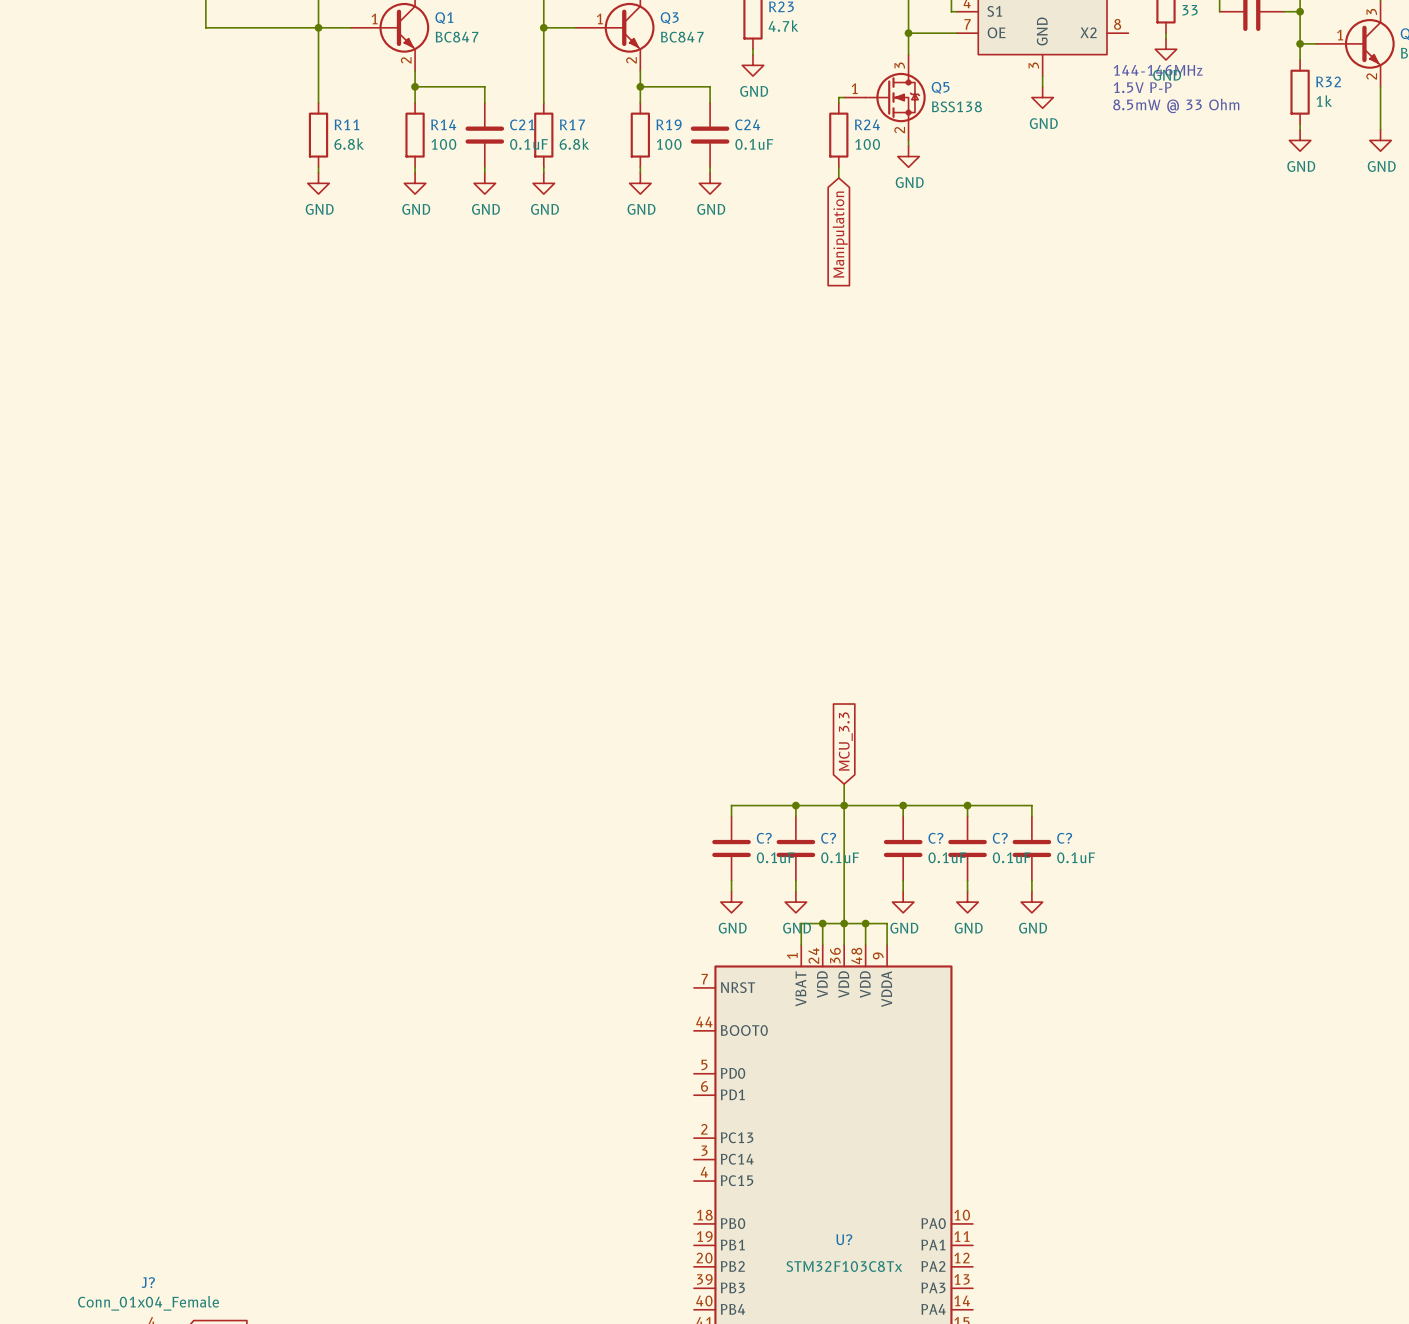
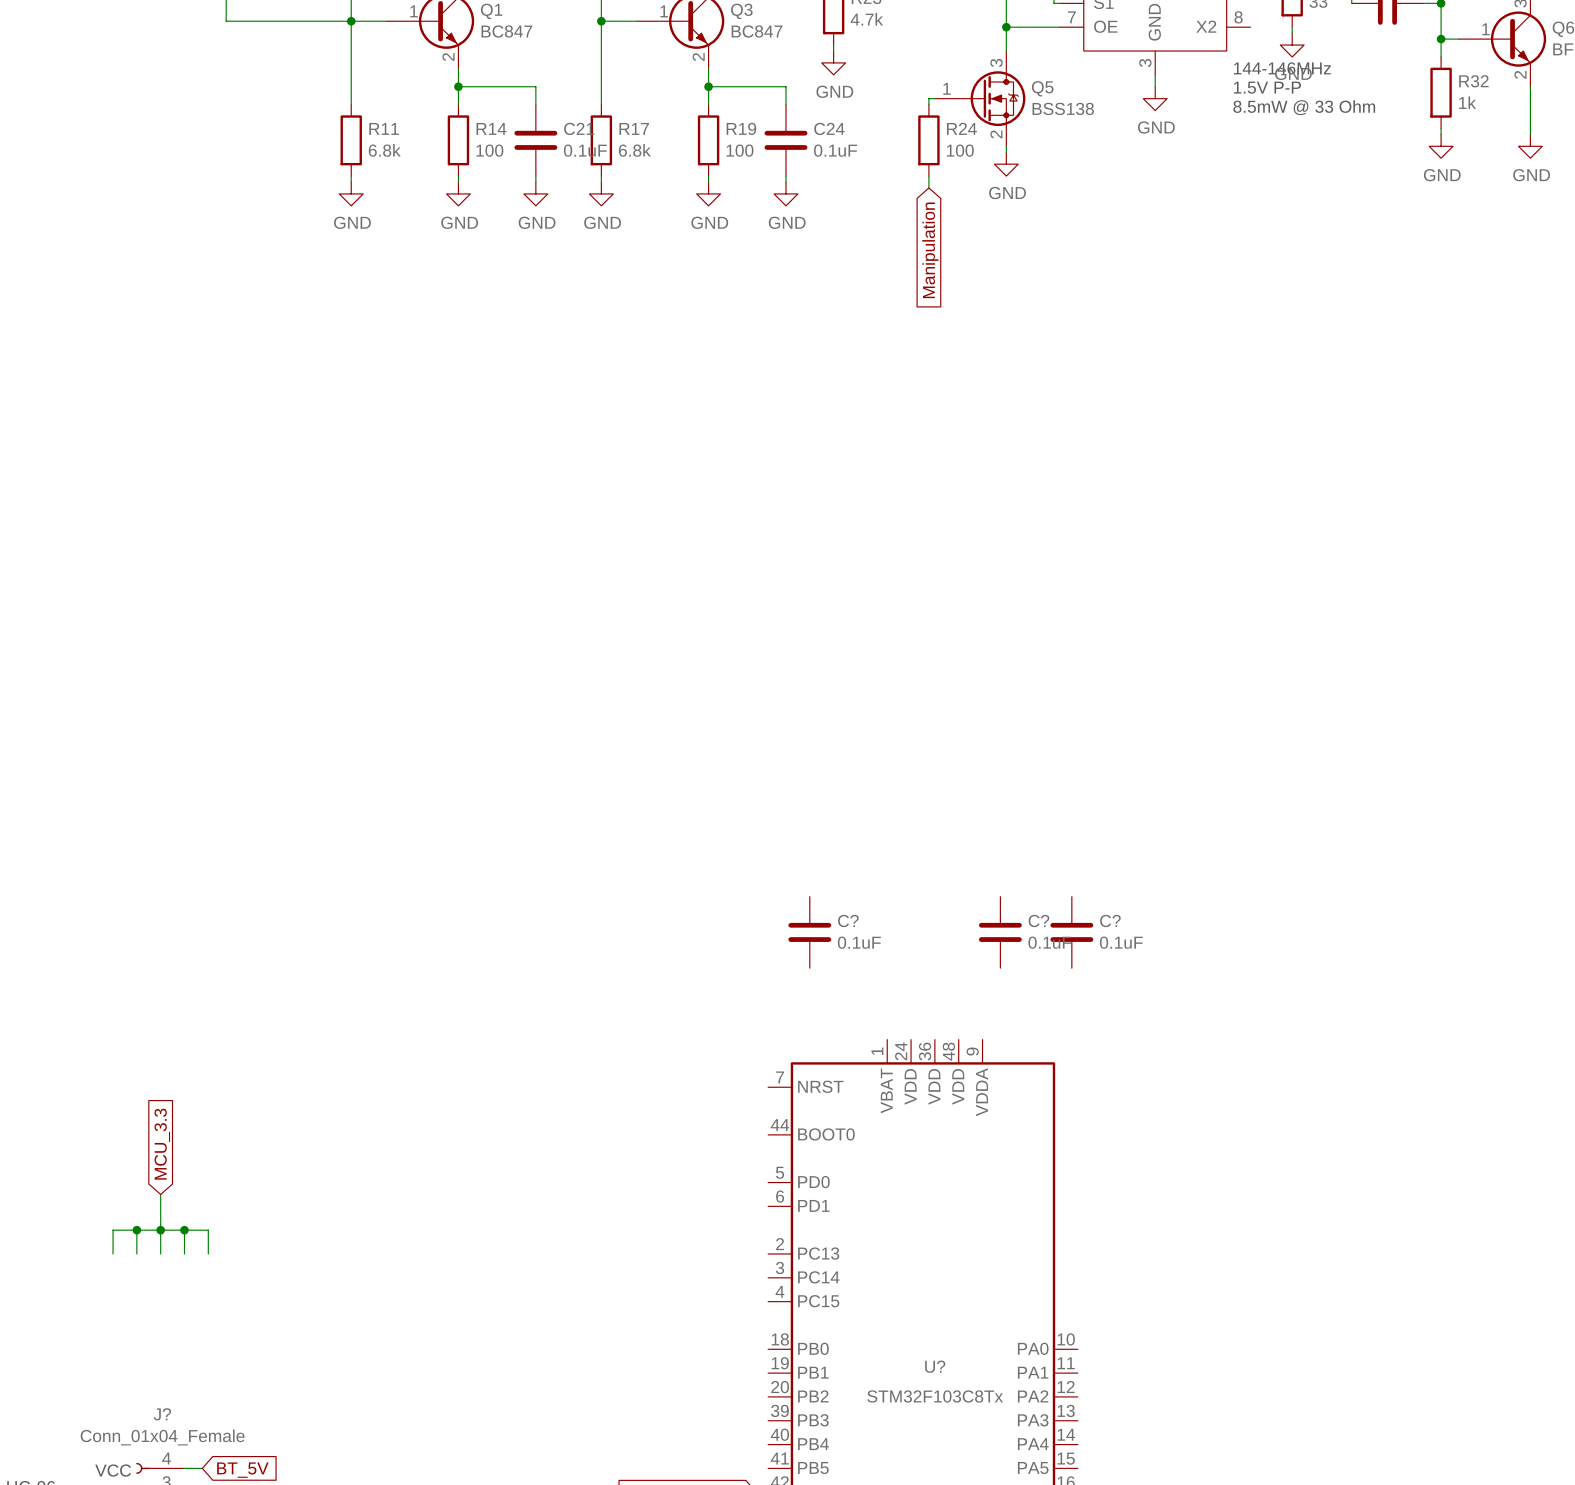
global label: MCU_3.3 (845, 741) -> none
wire: (844, 784) (844, 945) -> none
wire: (795, 805) (795, 816) -> none
junction: (795, 805) -> none
junction: (844, 805) -> none
wire: (903, 805) (903, 816) -> none
junction: (903, 805) -> none
wire: (967, 805) (967, 816) -> none
junction: (967, 805) -> none
wire: (731, 816) (731, 805) (1031, 805) (1031, 816) -> none
C?: 0.1uF (795, 848) -> none
C?: 0.1uF (1031, 848) -> none
wire: (731, 880) (731, 891) -> none
wire: (795, 880) (795, 891) -> none
wire: (903, 880) (903, 891) -> none
wire: (967, 880) (967, 891) -> none
wire: (1031, 880) (1031, 891) -> none
power symbol: GND (731, 902) -> none
power symbol: GND (795, 902) -> none
power symbol: GND (903, 902) -> none
power symbol: GND (967, 902) -> none
power symbol: GND (1031, 902) -> none
wire: (822, 923) (822, 945) -> none
junction: (822, 923) -> none
junction: (844, 923) -> none
wire: (865, 923) (865, 945) -> none
junction: (865, 923) -> none
wire: (801, 945) (801, 923) (887, 923) (887, 945) -> none
global label: none -> MCU_3.3 (162, 1144)
wire: none -> (160, 1194) (160, 1254)
wire: none -> (136, 1230) (136, 1254)
junction: none -> (136, 1230)
junction: none -> (160, 1230)
wire: none -> (184, 1230) (184, 1254)
junction: none -> (184, 1230)
wire: none -> (113, 1254) (113, 1230) (208, 1230) (208, 1254)

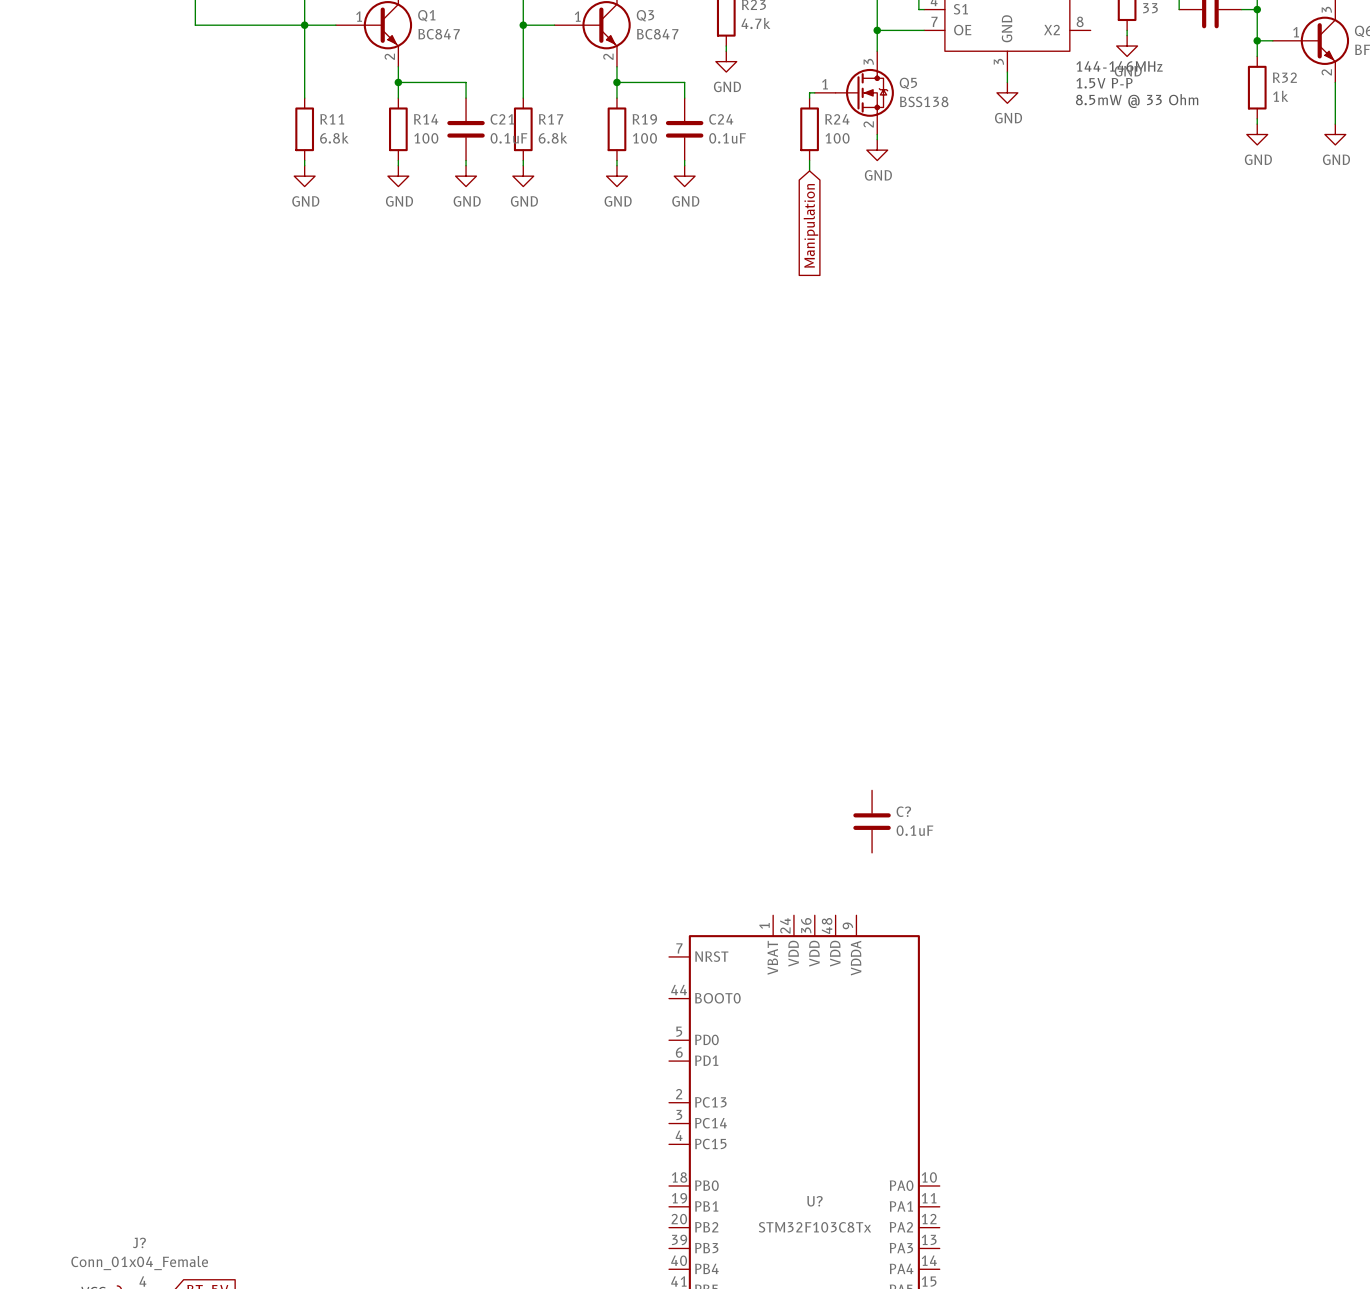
C?: 0.1uF (809, 932) -> none
C?: 0.1uF (1071, 932) -> none
global label: MCU_3.3 (162, 1144) -> none
wire: (160, 1194) (160, 1254) -> none
wire: (136, 1230) (136, 1254) -> none
junction: (136, 1230) -> none
junction: (160, 1230) -> none
wire: (184, 1230) (184, 1254) -> none
junction: (184, 1230) -> none
wire: (113, 1254) (113, 1230) (208, 1230) (208, 1254) -> none

